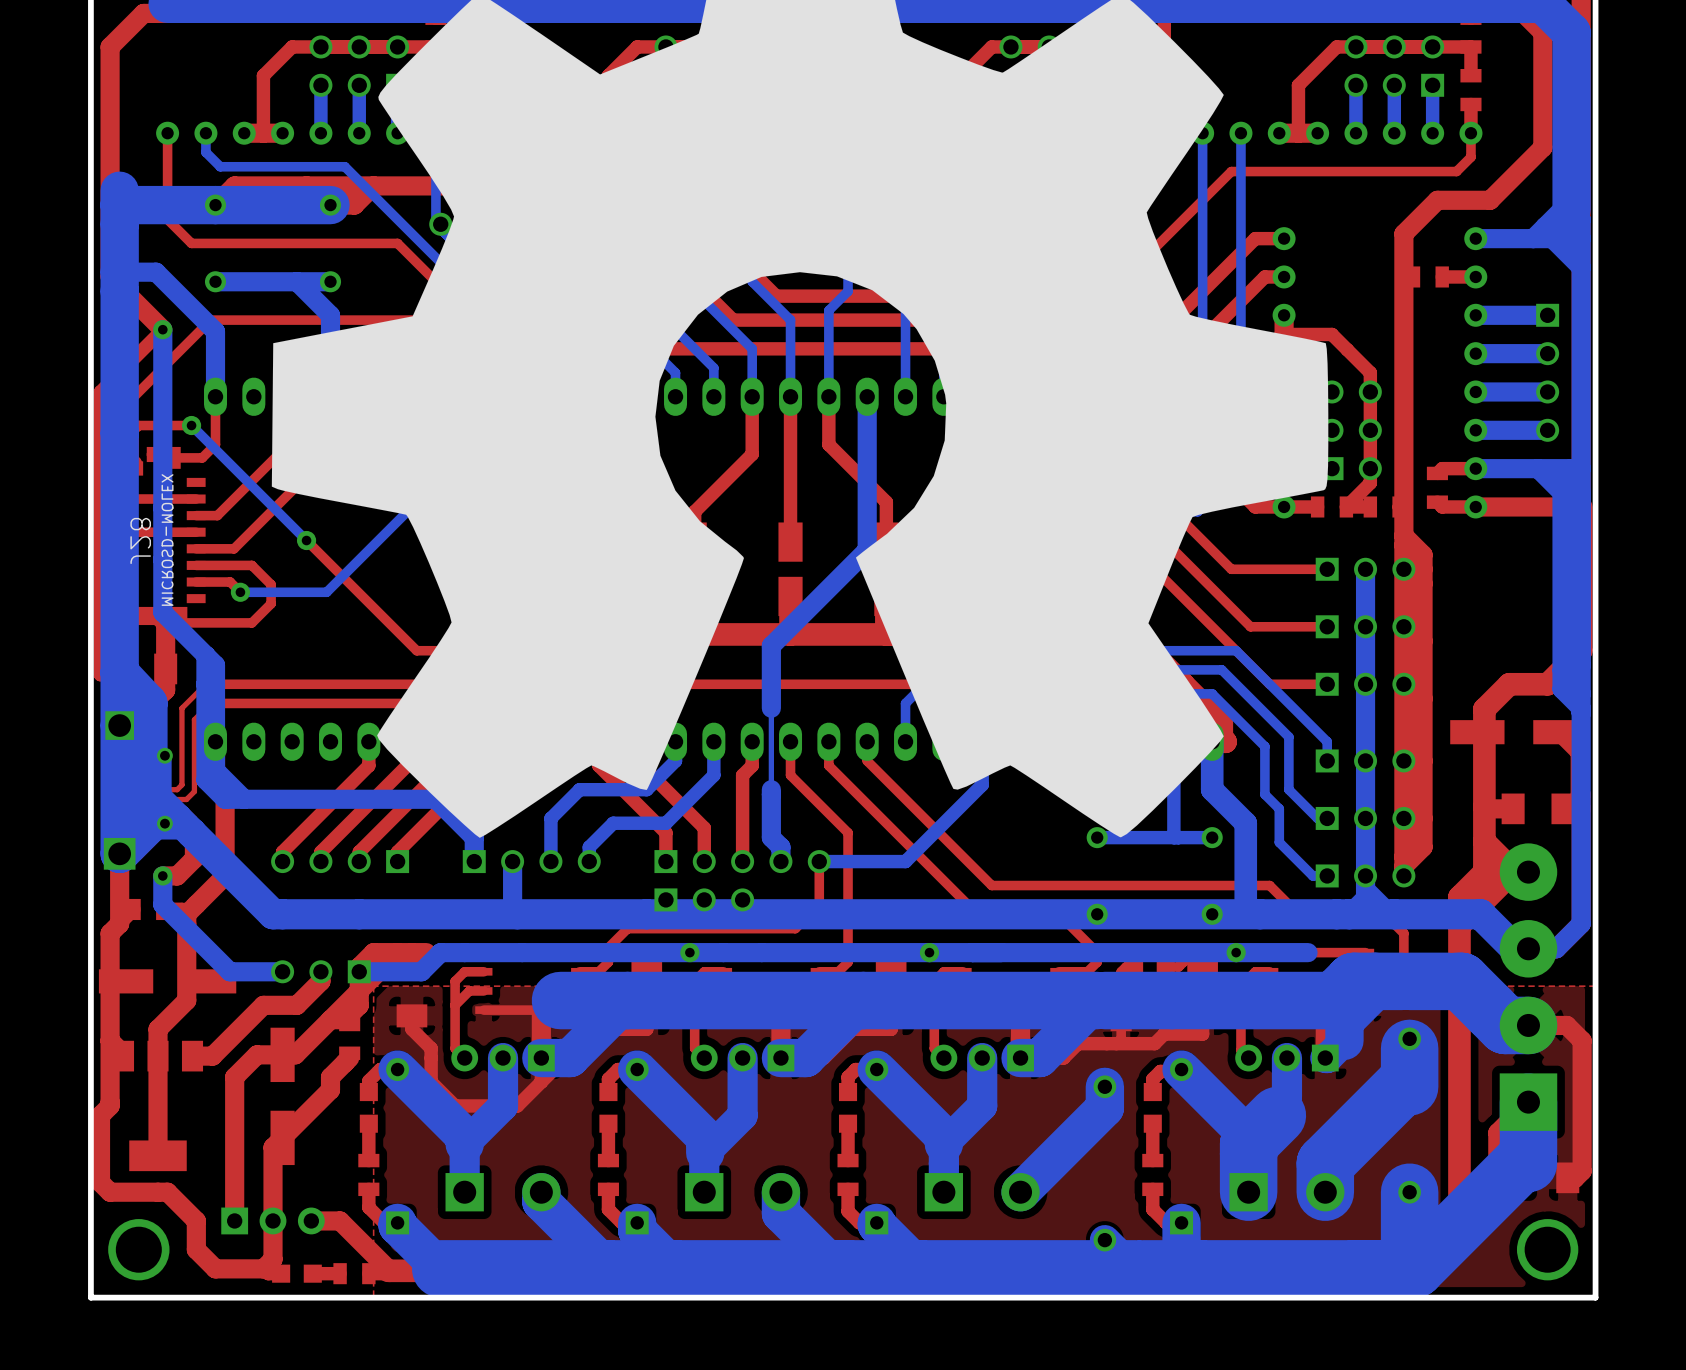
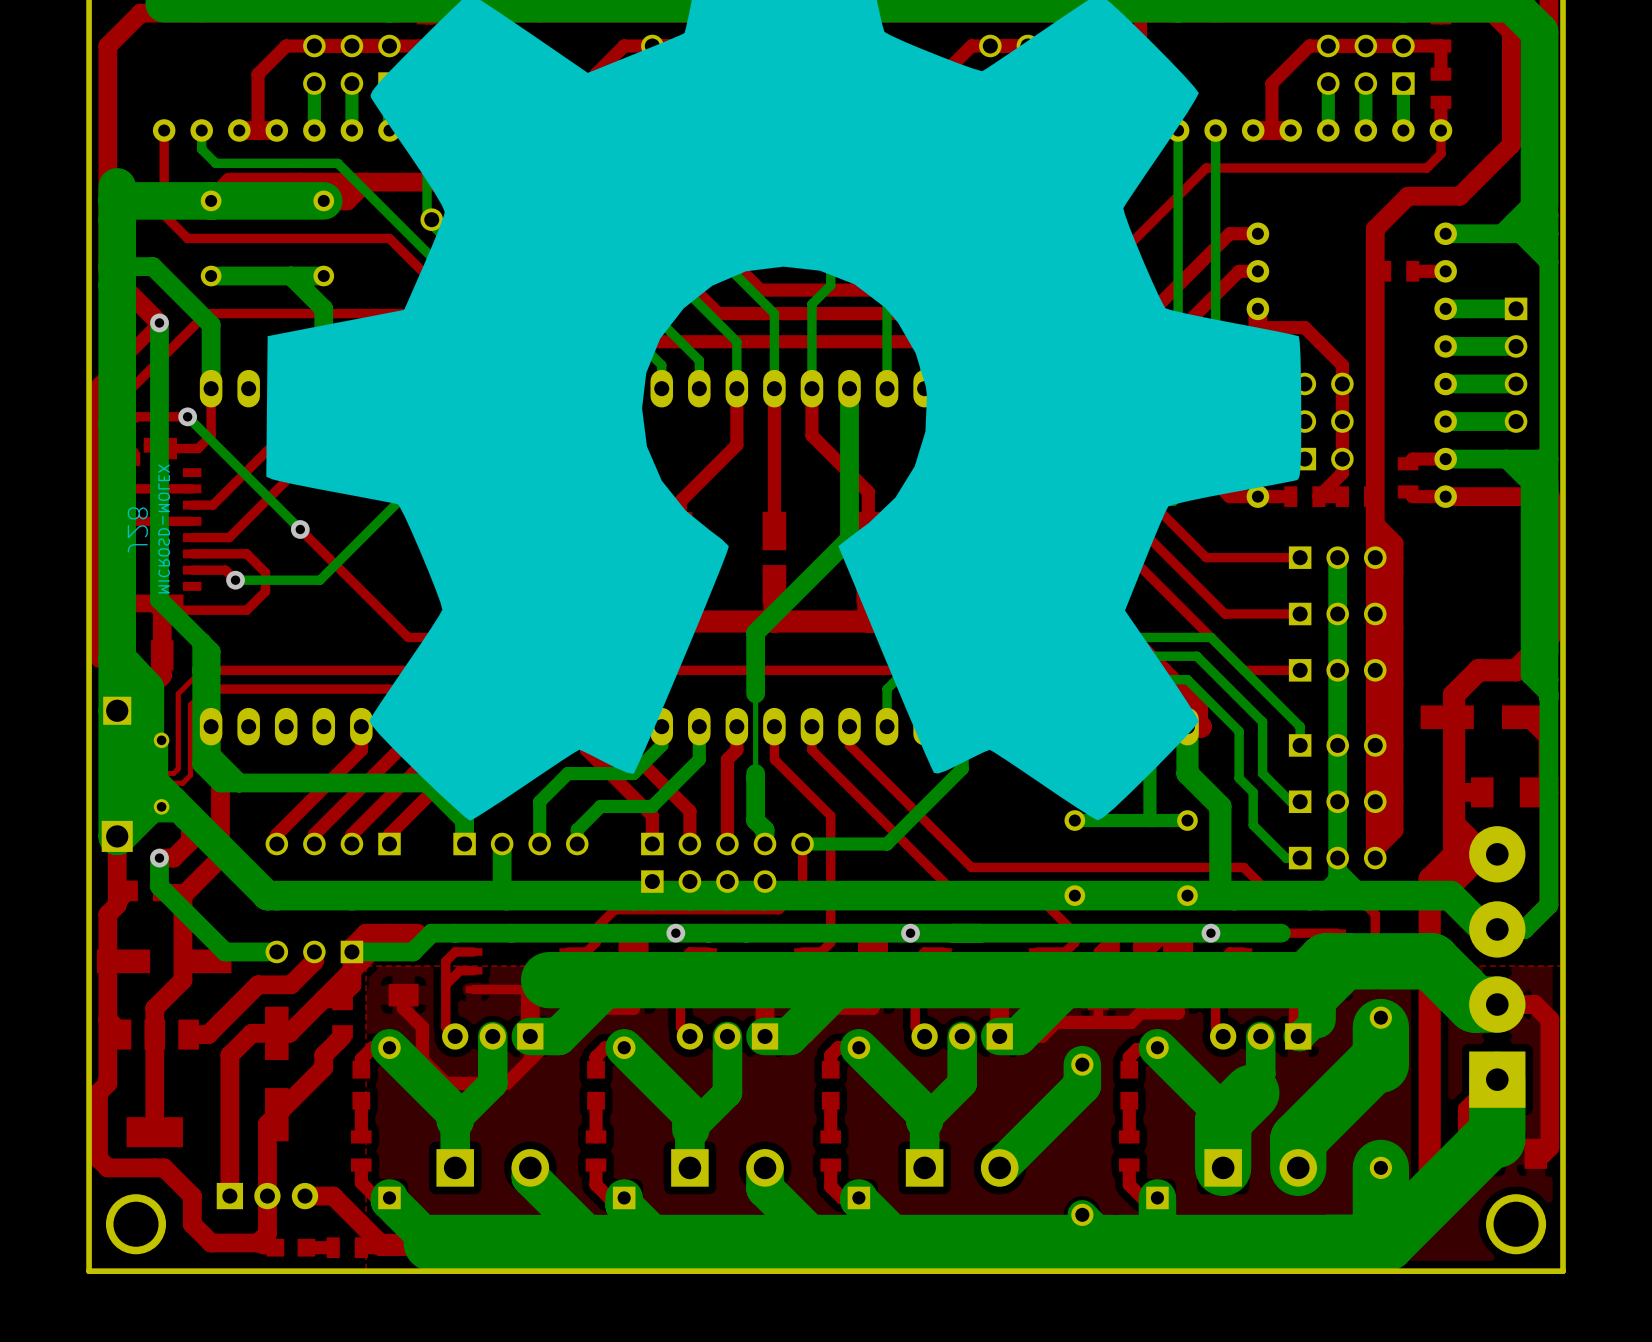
part: none -> (708, 881)

